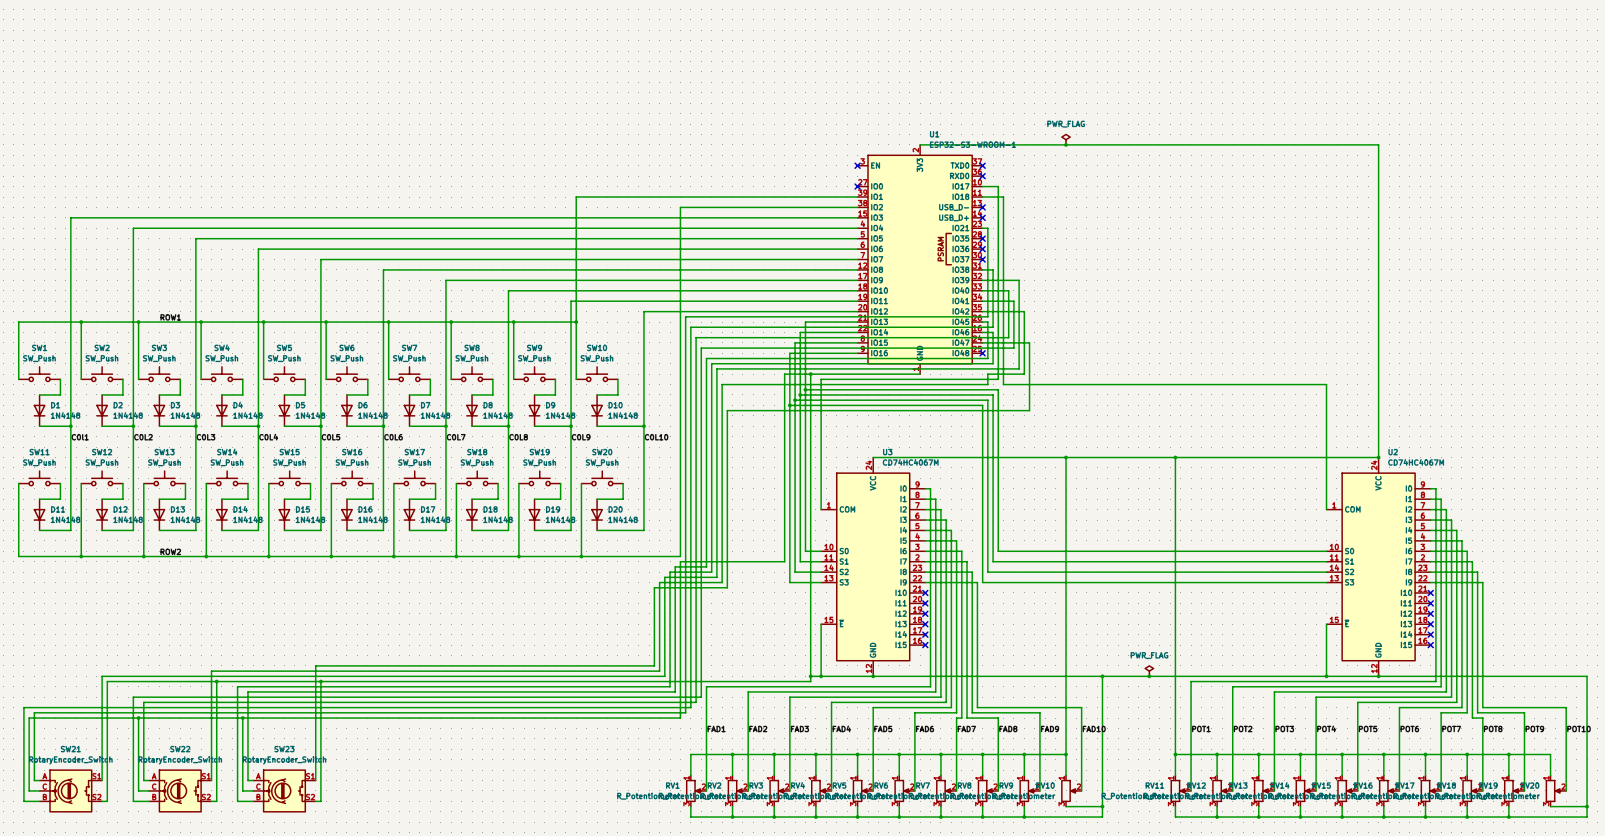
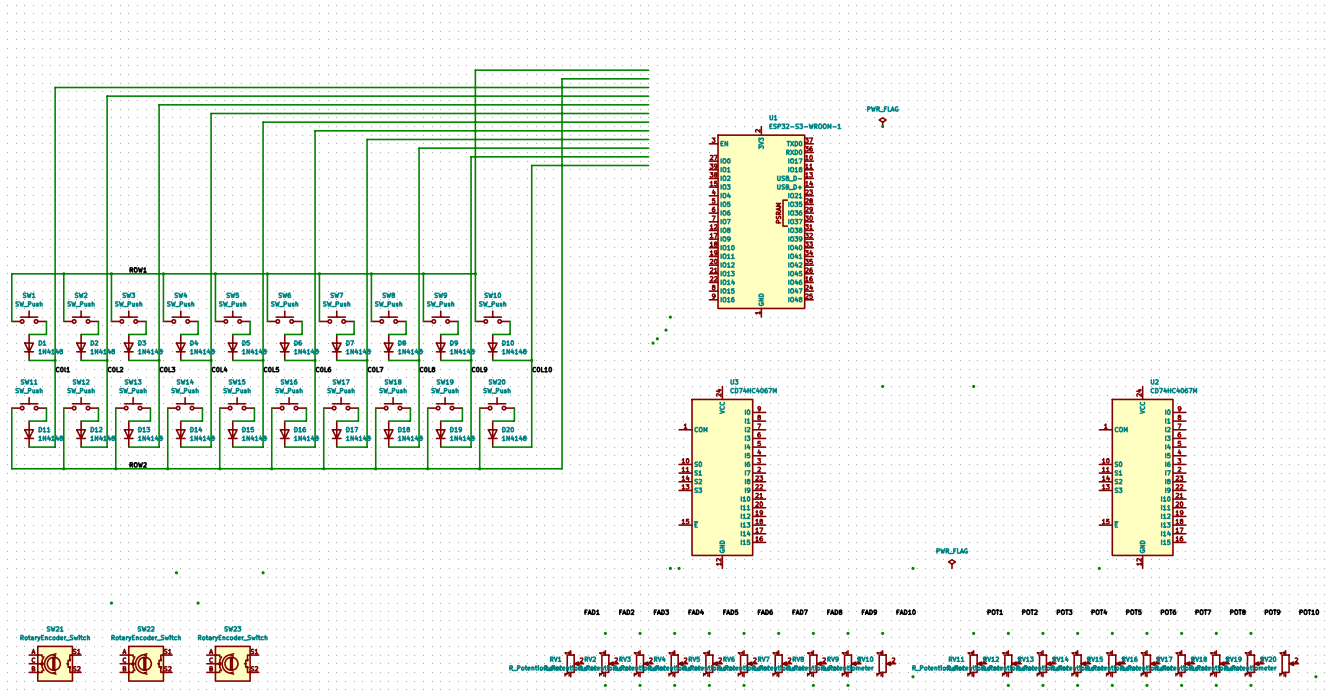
wire: (920, 144) (1378, 144) (1378, 457) (873, 457) -> none
no-connect mark: (857, 165) -> none
no-connect mark: (982, 165) -> none
no-connect mark: (982, 176) -> none
no-connect mark: (857, 186) -> none
wire: (982, 186) (998, 186) (998, 379) (821, 379) (821, 509) -> none
wire: (576, 197) (857, 197) -> (475, 169) (475, 70) (648, 70)
wire: (982, 197) (1003, 197) (1003, 384) (1326, 384) (1326, 509) -> none
wire: (680, 207) (857, 207) -> (562, 178) (562, 78) (648, 78)
no-connect mark: (982, 207) -> none
wire: (70, 217) (857, 217) -> (55, 187) (55, 87) (648, 87)
no-connect mark: (982, 217) -> none
wire: (133, 228) (857, 228) -> (107, 195) (107, 96) (648, 96)
wire: (982, 228) (987, 228) (987, 316) (685, 316) (685, 712) (34, 712) (34, 780) (39, 780) -> none
wire: (195, 238) (857, 238) -> (159, 204) (159, 104) (648, 104)
no-connect mark: (982, 238) -> none
wire: (258, 249) (857, 249) -> (211, 213) (211, 113) (648, 113)
no-connect mark: (982, 249) -> none
wire: (320, 259) (857, 259) -> (263, 221) (263, 122) (648, 122)
no-connect mark: (982, 259) -> none
wire: (383, 269) (857, 269) -> (315, 230) (315, 130) (648, 130)
wire: (982, 269) (993, 269) (993, 327) (690, 327) (690, 707) (23, 707) (23, 801) (39, 801) -> none
wire: (445, 280) (857, 280) -> (367, 239) (367, 139) (648, 139)
wire: (982, 280) (1019, 280) (1019, 368) (716, 368) (716, 577) (664, 577) (664, 676) (102, 676) (102, 780) -> none
wire: (508, 290) (857, 290) -> (419, 247) (419, 148) (648, 148)
wire: (982, 290) (1008, 290) (1008, 337) (696, 337) (696, 702) (143, 702) (143, 780) (148, 780) -> none
wire: (571, 301) (857, 301) -> (471, 256) (471, 156) (648, 156)
wire: (982, 301) (1013, 301) (1013, 348) (701, 348) (701, 697) (133, 697) (133, 801) (148, 801) -> none
wire: (643, 311) (857, 311) -> (531, 265) (531, 165) (648, 165)
wire: (982, 311) (1024, 311) (1024, 374) (987, 374) (987, 384) (722, 384) (722, 582) (659, 582) (659, 671) (211, 671) (211, 780) -> none
wire: (857, 322) (805, 322) (805, 551) (821, 551) -> none
wire: (982, 322) (987, 322) (987, 358) (706, 358) (706, 566) (675, 566) (675, 691) (247, 691) (247, 780) (253, 780) -> none
wire: (857, 332) (800, 332) (800, 561) (821, 561) -> none
wire: (982, 332) (993, 332) (993, 363) (711, 363) (711, 572) (670, 572) (670, 686) (237, 686) (237, 801) (253, 801) -> none
wire: (857, 342) (795, 342) (795, 572) (821, 572) -> none
wire: (982, 342) (1029, 342) (1029, 410) (727, 410) (727, 587) (654, 587) (654, 665) (315, 665) (315, 780) -> none
wire: (857, 353) (789, 353) (789, 582) (821, 582) -> none
no-connect mark: (982, 353) -> none
wire: (810, 374) (810, 681) (107, 681) (107, 801) (102, 801) -> none
wire: (920, 374) (784, 374) (784, 561) (680, 561) (680, 718) (29, 718) (29, 790) (39, 790) -> none
wire: (805, 389) (998, 389) (998, 551) (1326, 551) -> none
wire: (800, 394) (993, 394) (993, 561) (1326, 561) -> none
junction: (800, 394) -> none
wire: (795, 400) (987, 400) (987, 572) (1326, 572) -> none
wire: (789, 405) (982, 405) (982, 582) (1326, 582) -> none
wire: (1066, 457) (1066, 775) -> none
wire: (1175, 457) (1175, 775) -> none
junction: (1378, 457) -> none
wire: (925, 488) (930, 488) (930, 686) (706, 686) (706, 790) -> none
wire: (1430, 488) (1435, 488) (1435, 681) (1191, 681) (1191, 790) -> none
wire: (925, 499) (935, 499) (935, 691) (748, 691) (748, 790) -> none
wire: (1430, 499) (1441, 499) (1441, 686) (1232, 686) (1232, 790) -> none
wire: (925, 509) (940, 509) (940, 697) (789, 697) (789, 790) -> none
wire: (1430, 509) (1446, 509) (1446, 691) (1274, 691) (1274, 790) -> none
wire: (925, 520) (946, 520) (946, 702) (831, 702) (831, 790) -> none
wire: (1430, 520) (1451, 520) (1451, 697) (1316, 697) (1316, 790) -> none
wire: (925, 530) (951, 530) (951, 707) (873, 707) (873, 790) -> none
wire: (1430, 530) (1456, 530) (1456, 702) (1357, 702) (1357, 790) -> none
wire: (925, 540) (956, 540) (956, 712) (914, 712) (914, 790) -> none
wire: (1430, 540) (1461, 540) (1461, 707) (1399, 707) (1399, 790) -> none
wire: (925, 551) (961, 551) (961, 718) (956, 718) (956, 790) -> none
wire: (1430, 551) (1467, 551) (1467, 712) (1441, 712) (1441, 790) -> none
wire: (925, 561) (967, 561) (967, 718) (998, 718) (998, 790) -> none
wire: (1430, 561) (1472, 561) (1472, 718) (1482, 718) (1482, 790) -> none
wire: (925, 572) (972, 572) (972, 712) (1039, 712) (1039, 790) -> none
wire: (1430, 572) (1477, 572) (1477, 712) (1524, 712) (1524, 790) -> none
wire: (925, 582) (977, 582) (977, 707) (1081, 707) (1081, 790) -> none
wire: (1430, 582) (1482, 582) (1482, 707) (1566, 707) (1566, 790) -> none
no-connect mark: (925, 592) -> none
no-connect mark: (1430, 592) -> none
no-connect mark: (925, 603) -> none
no-connect mark: (1430, 603) -> none
no-connect mark: (925, 613) -> none
no-connect mark: (1430, 613) -> none
wire: (821, 624) (821, 676) -> none
no-connect mark: (925, 624) -> none
wire: (1326, 624) (1326, 676) -> none
no-connect mark: (1430, 624) -> none
no-connect mark: (925, 634) -> none
no-connect mark: (1430, 634) -> none
no-connect mark: (925, 645) -> none
no-connect mark: (1430, 645) -> none
wire: (810, 676) (1587, 676) (1587, 817) (1175, 817) (1175, 806) -> none
junction: (873, 676) -> none
wire: (1102, 676) (1102, 817) (690, 817) (690, 806) -> none
junction: (1149, 676) -> none
junction: (1378, 676) -> none
wire: (216, 681) (216, 801) (211, 801) -> none
wire: (320, 681) (320, 801) (315, 801) -> none
wire: (138, 718) (138, 790) (148, 790) -> none
wire: (242, 718) (242, 790) (253, 790) -> none
wire: (732, 754) (732, 775) -> none
wire: (774, 754) (774, 775) -> none
wire: (815, 754) (815, 775) -> none
wire: (857, 754) (857, 775) -> none
wire: (899, 754) (899, 775) -> none
wire: (940, 754) (940, 775) -> none
wire: (982, 754) (982, 775) -> none
wire: (1024, 754) (1024, 775) -> none
wire: (1066, 754) (690, 754) (690, 775) -> none
wire: (1175, 754) (1550, 754) (1550, 775) -> none
wire: (1217, 754) (1217, 775) -> none
wire: (1258, 754) (1258, 775) -> none
wire: (1300, 754) (1300, 775) -> none
wire: (1342, 754) (1342, 775) -> none
wire: (1383, 754) (1383, 775) -> none
wire: (1425, 754) (1425, 775) -> none
wire: (1467, 754) (1467, 775) -> none
wire: (1508, 754) (1508, 775) -> none
wire: (732, 806) (732, 817) -> none
wire: (774, 806) (774, 817) -> none
wire: (815, 806) (815, 817) -> none
wire: (857, 806) (857, 817) -> none
wire: (899, 806) (899, 817) -> none
wire: (940, 806) (940, 817) -> none
wire: (982, 806) (982, 817) -> none
wire: (1024, 806) (1024, 817) -> none
wire: (1066, 806) (1102, 806) -> none
wire: (1217, 806) (1217, 817) -> none
wire: (1258, 806) (1258, 817) -> none
wire: (1300, 806) (1300, 817) -> none
wire: (1342, 806) (1342, 817) -> none
wire: (1383, 806) (1383, 817) -> none
wire: (1425, 806) (1425, 817) -> none
wire: (1467, 806) (1467, 817) -> none
wire: (1508, 806) (1508, 817) -> none
wire: (1550, 806) (1587, 806) -> none
junction: (940, 817) -> none

